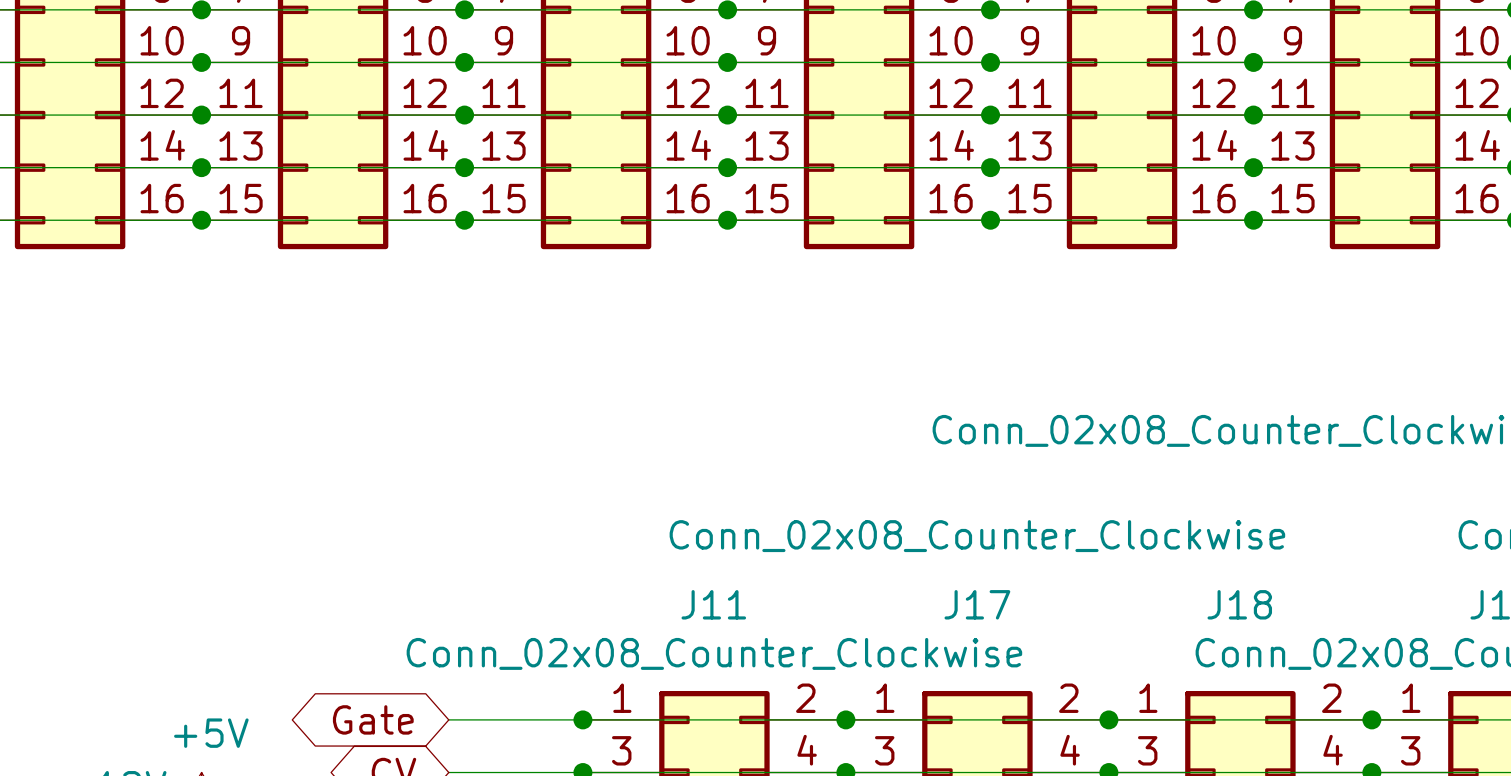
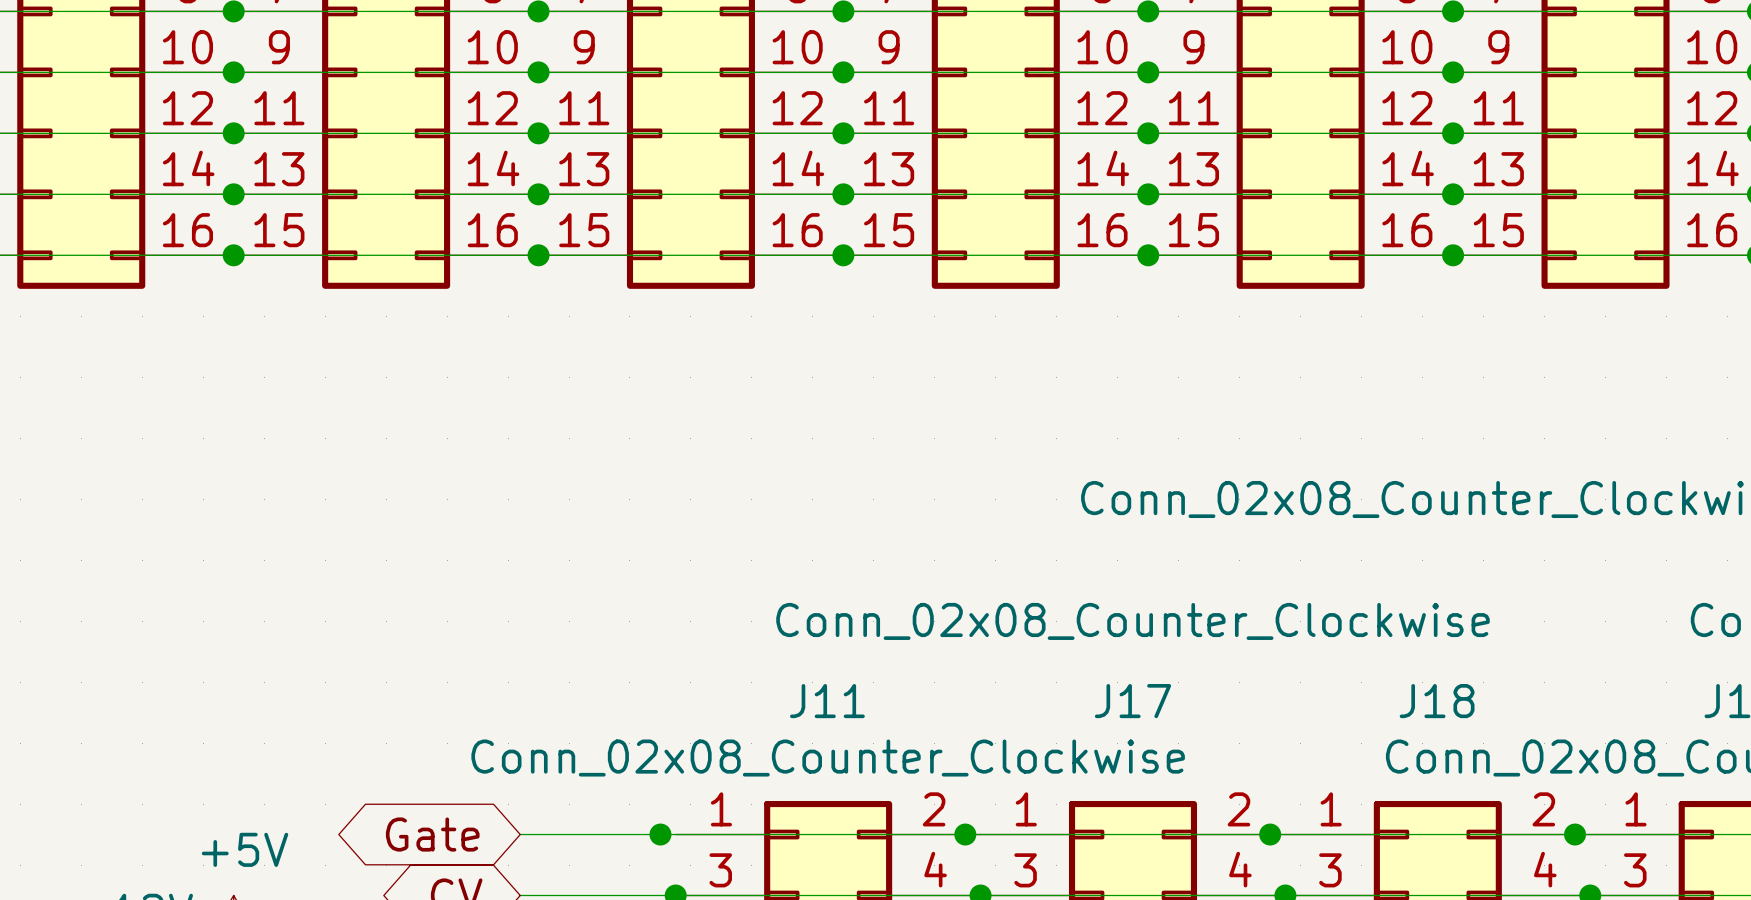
junction position: (582, 719) -> (660, 834)
junction position: (845, 719) -> (965, 834)
junction position: (1108, 719) -> (1270, 834)
junction position: (1371, 719) -> (1575, 834)

